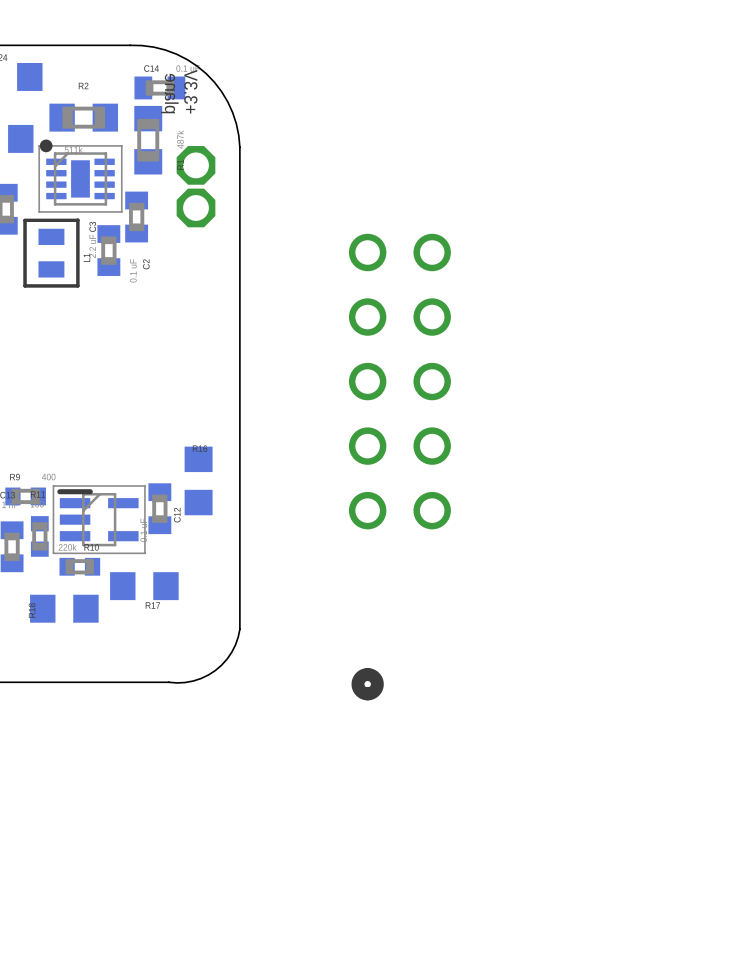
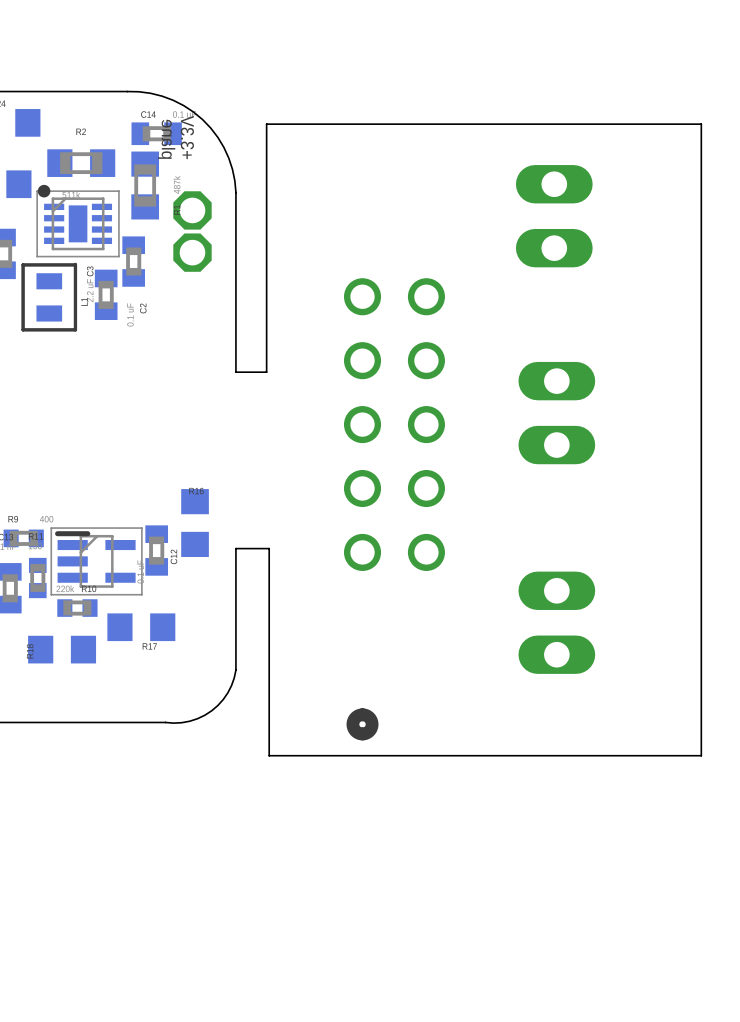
part: none -> (554, 216)
board edge: (239, 328) (239, 506) -> (235, 372) (266, 372) (266, 124) (701, 124) (701, 755) (269, 755) (269, 548) (235, 548)
part: none -> (556, 413)
part: none -> (556, 622)

